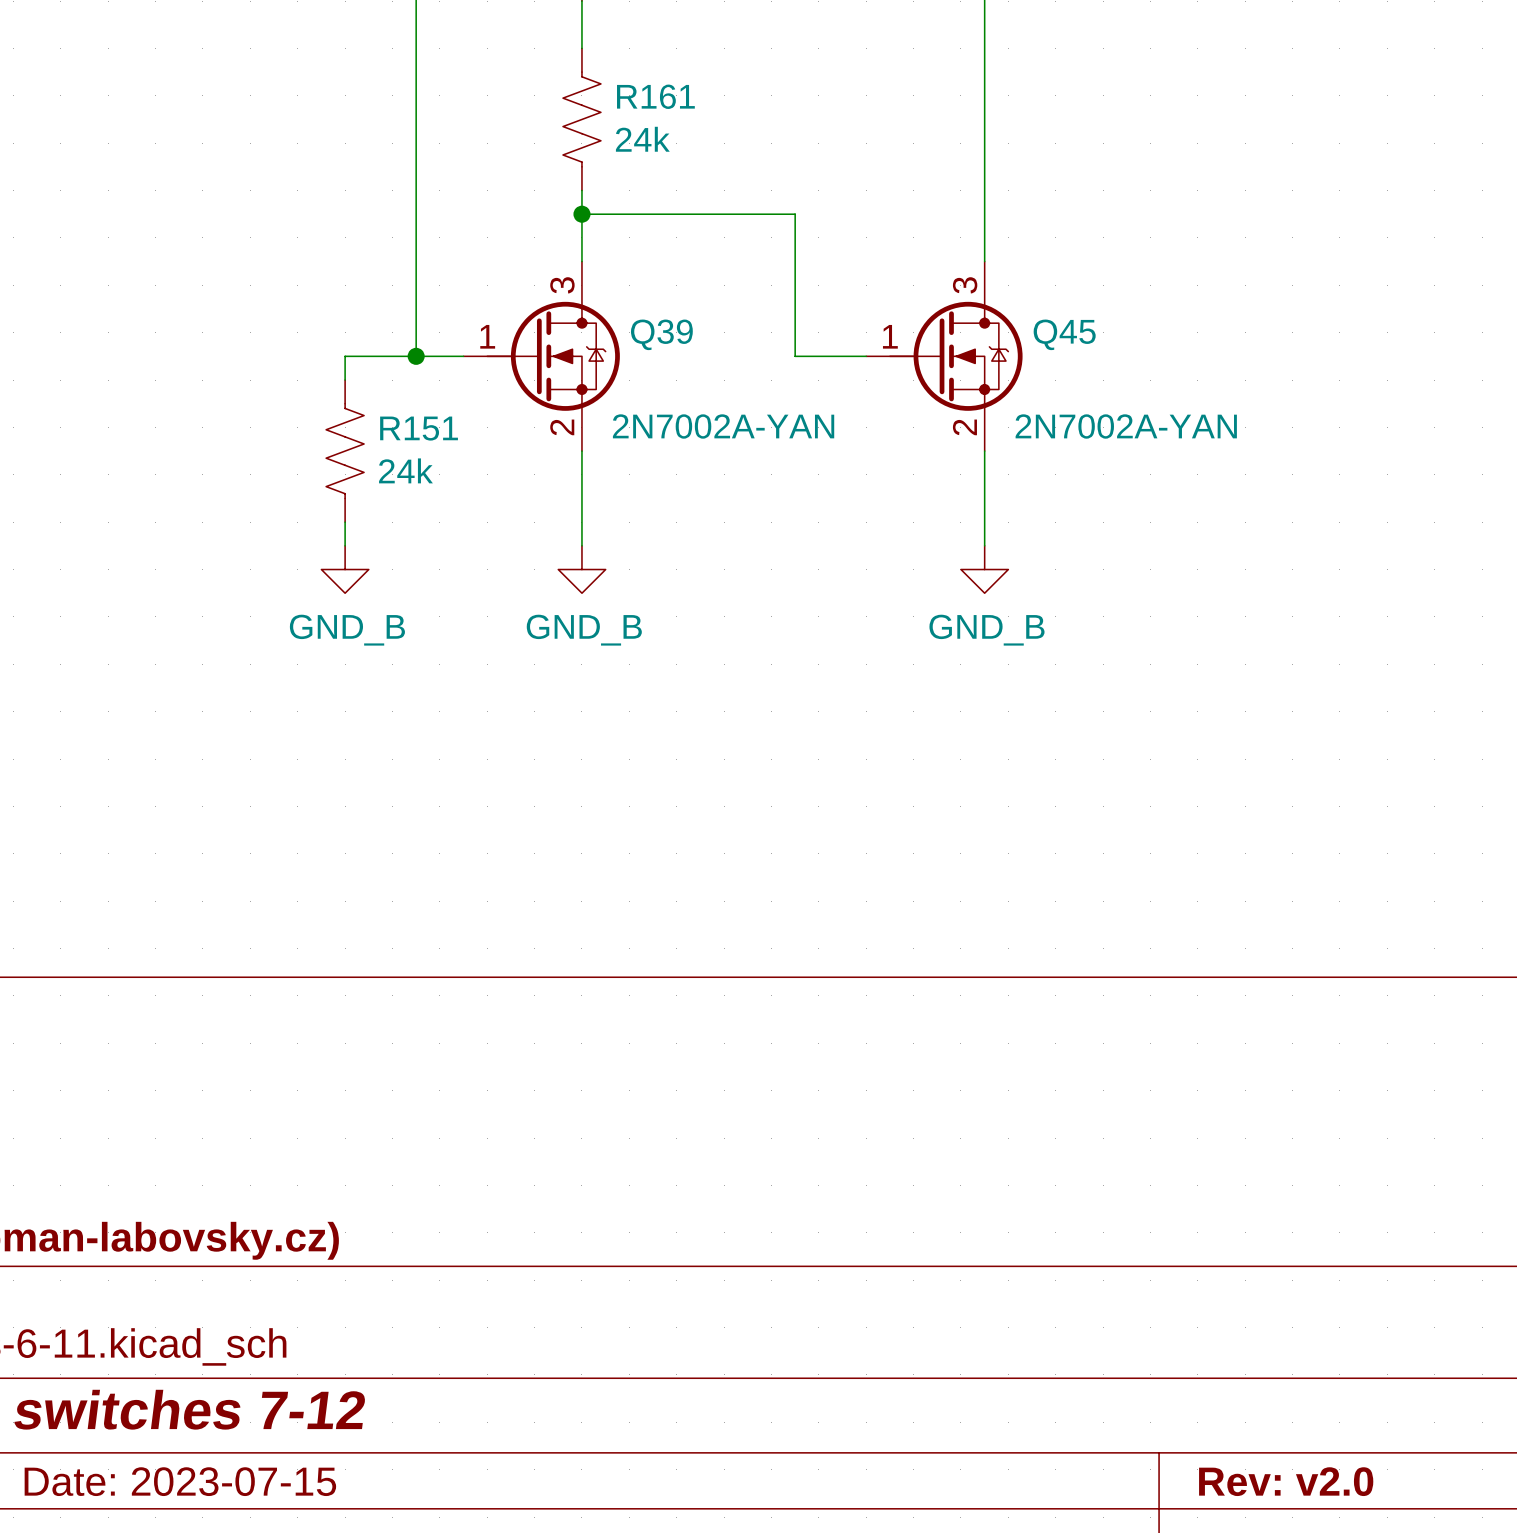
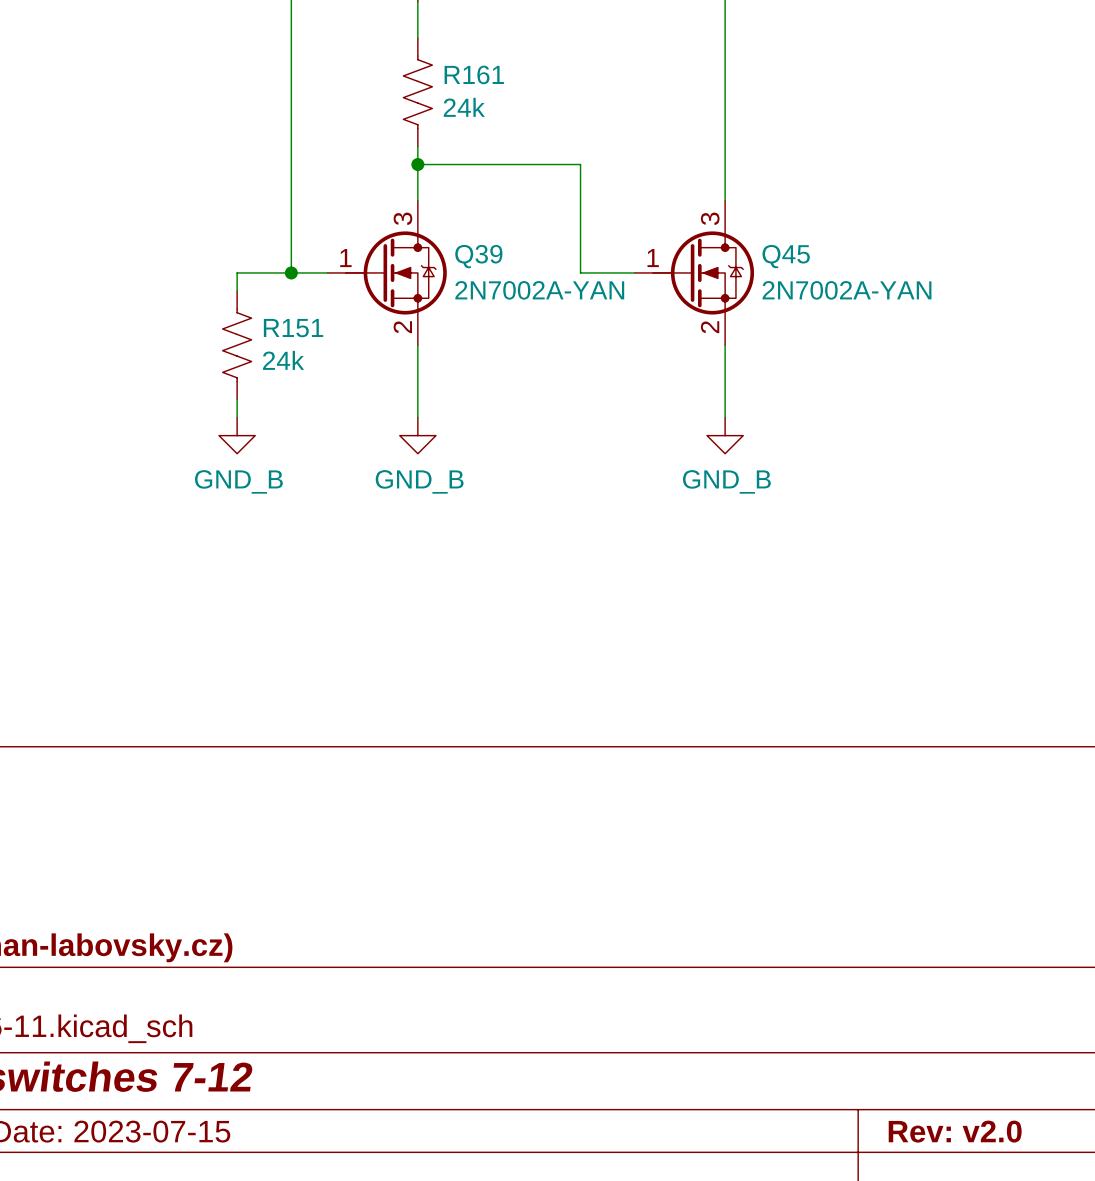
Q39 value position: 2N7002A-YAN (723, 426) -> 2N7002A-YAN (539, 290)
Q45 value position: 2N7002A-YAN (1126, 426) -> 2N7002A-YAN (847, 290)

